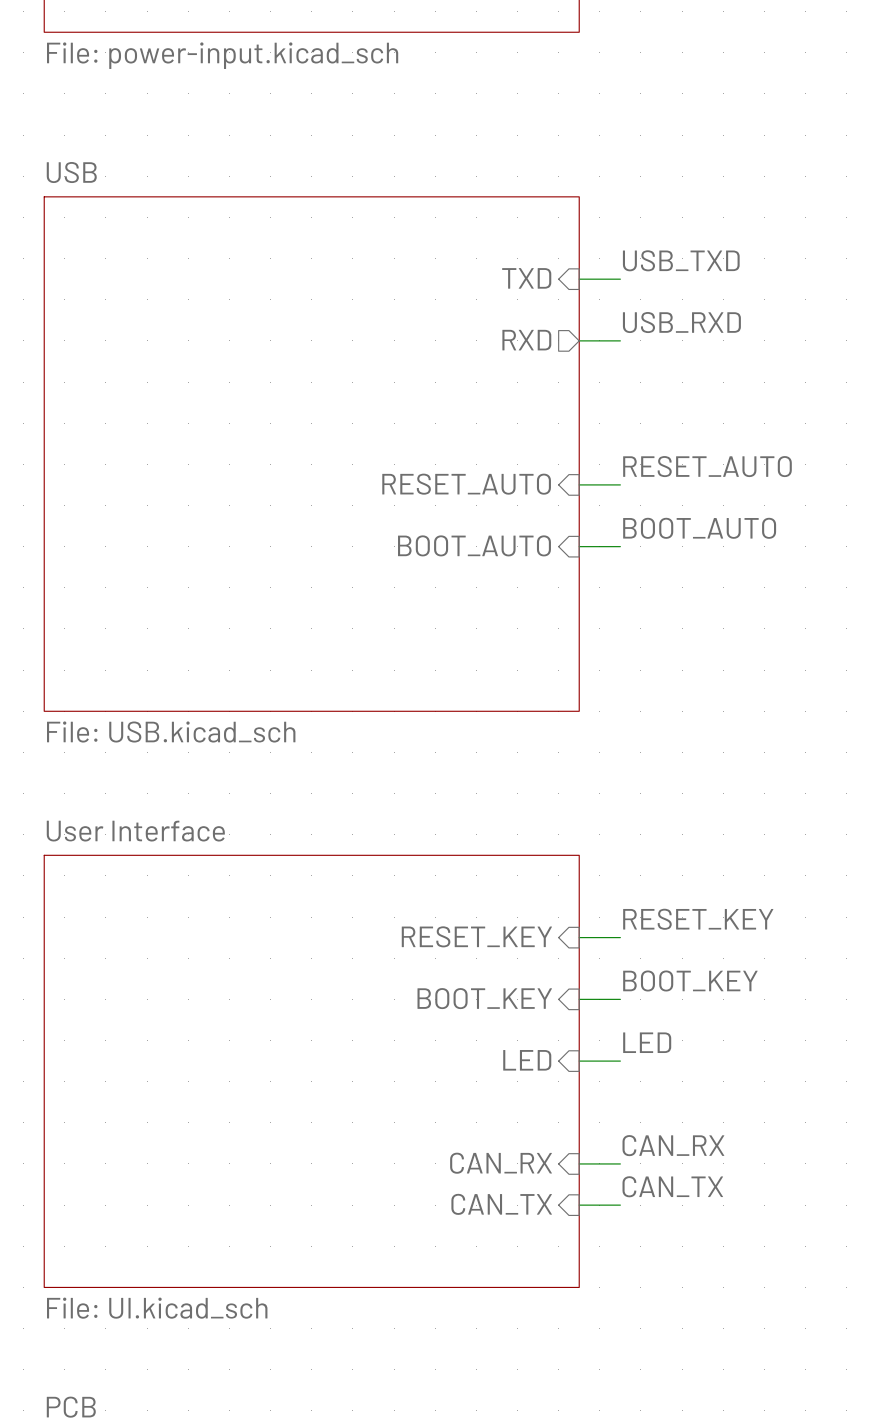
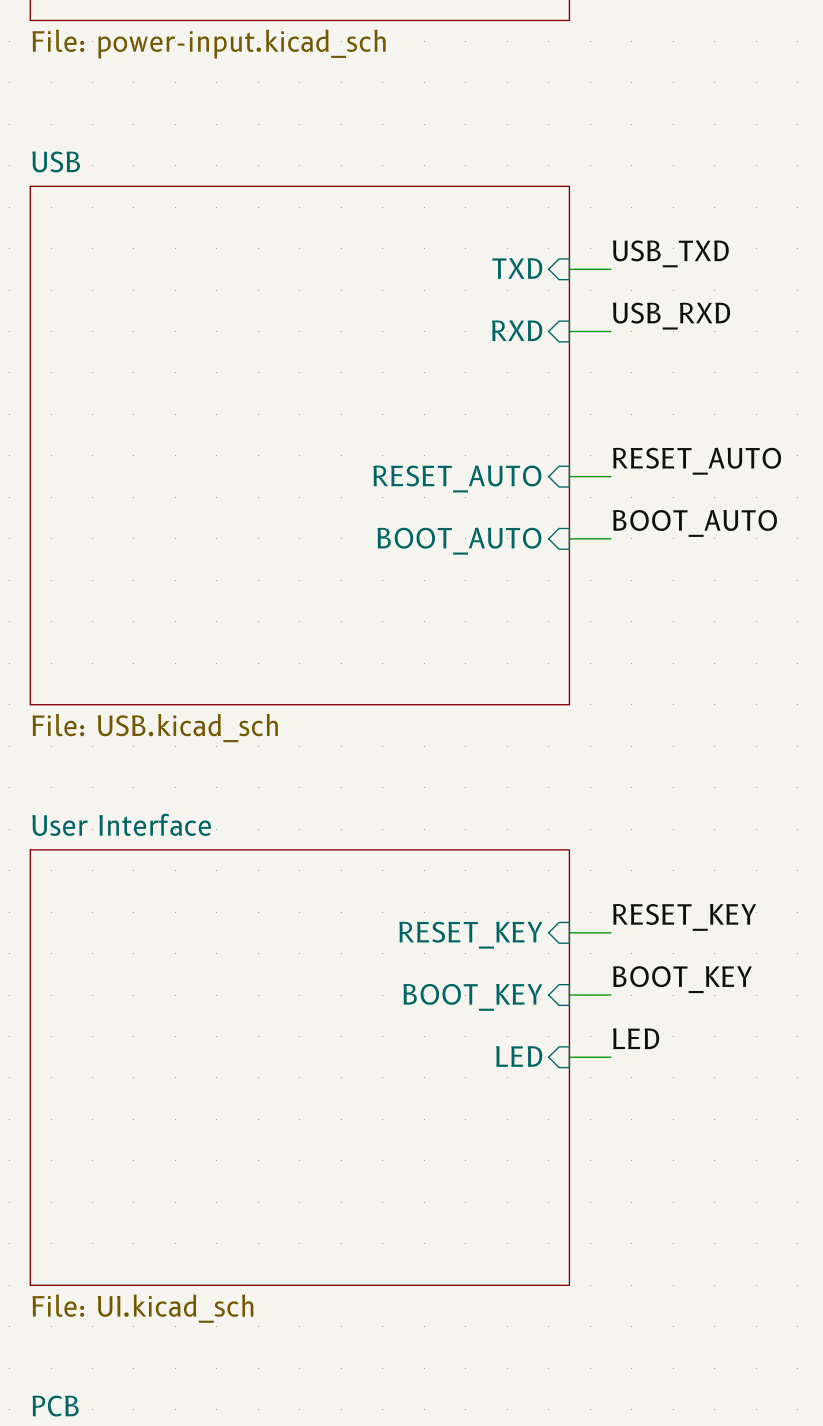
sheet pin shape: output (526, 340) -> input (517, 330)
label: CAN_RX (673, 1145) -> none
sheet pin: CAN_RX (501, 1163) -> none
wire: (579, 1163) (620, 1163) -> none
label: CAN_TX (672, 1186) -> none
sheet pin: CAN_TX (501, 1204) -> none
wire: (579, 1205) (620, 1205) -> none

